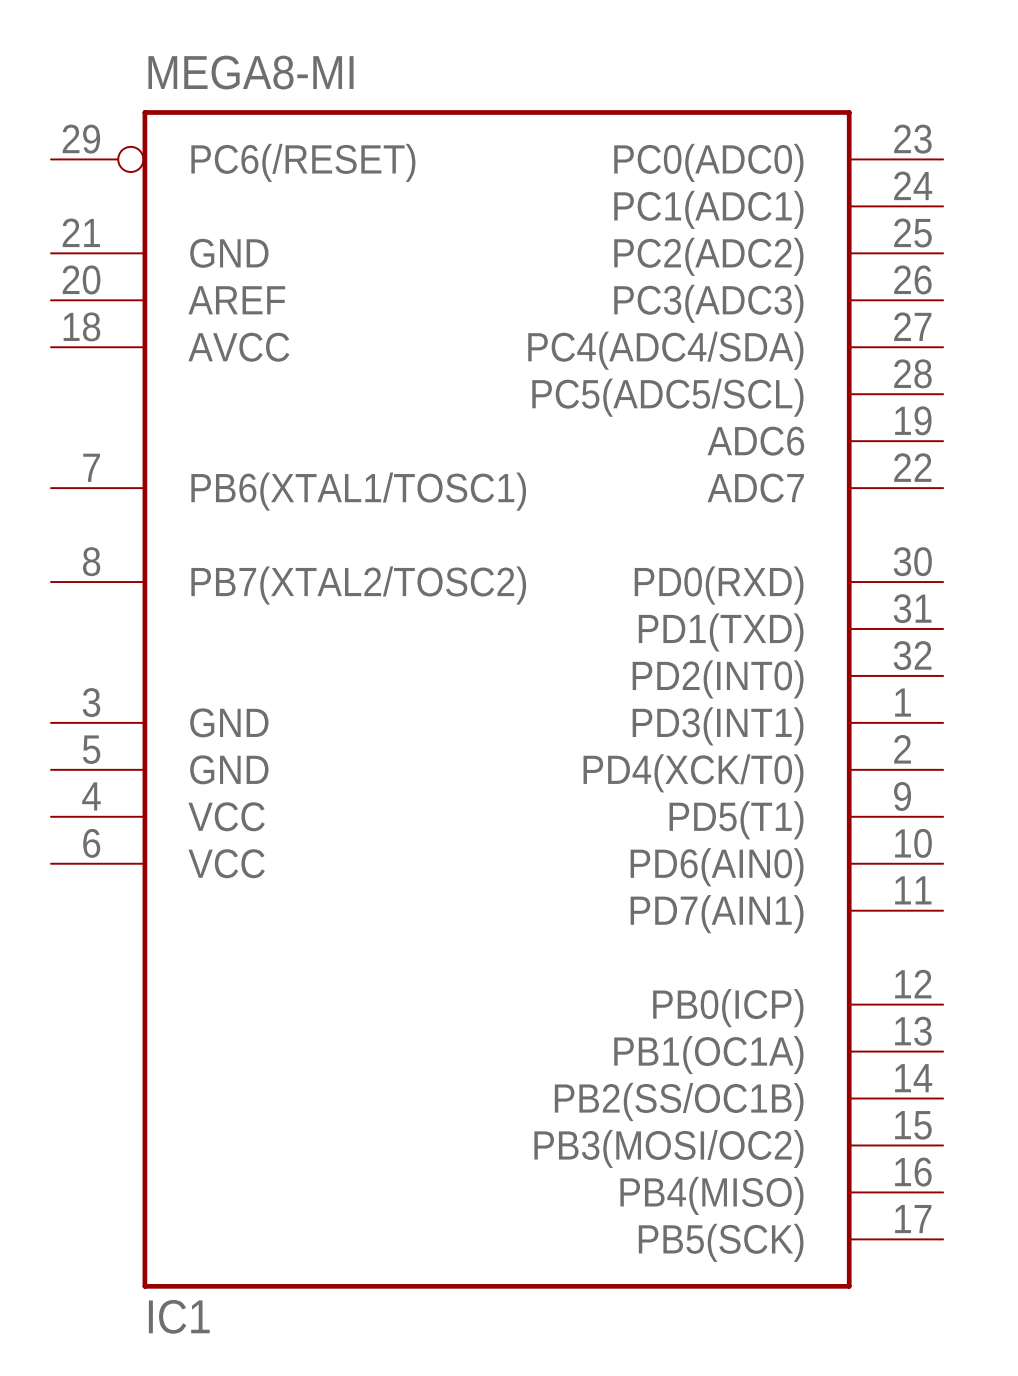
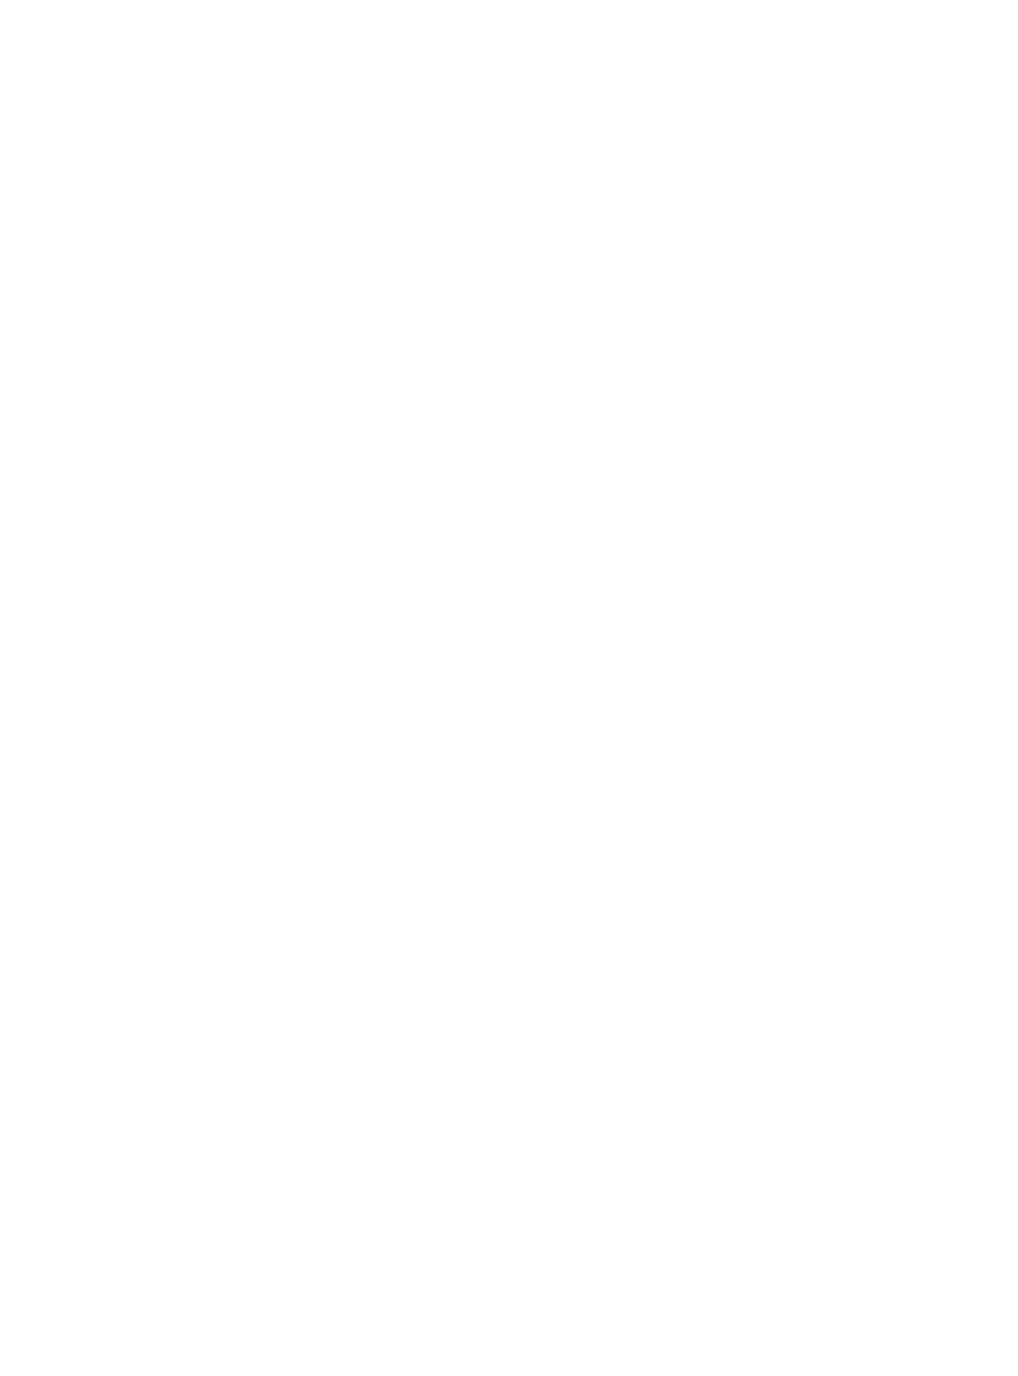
IC1: MEGA8-MI (497, 699) -> none

